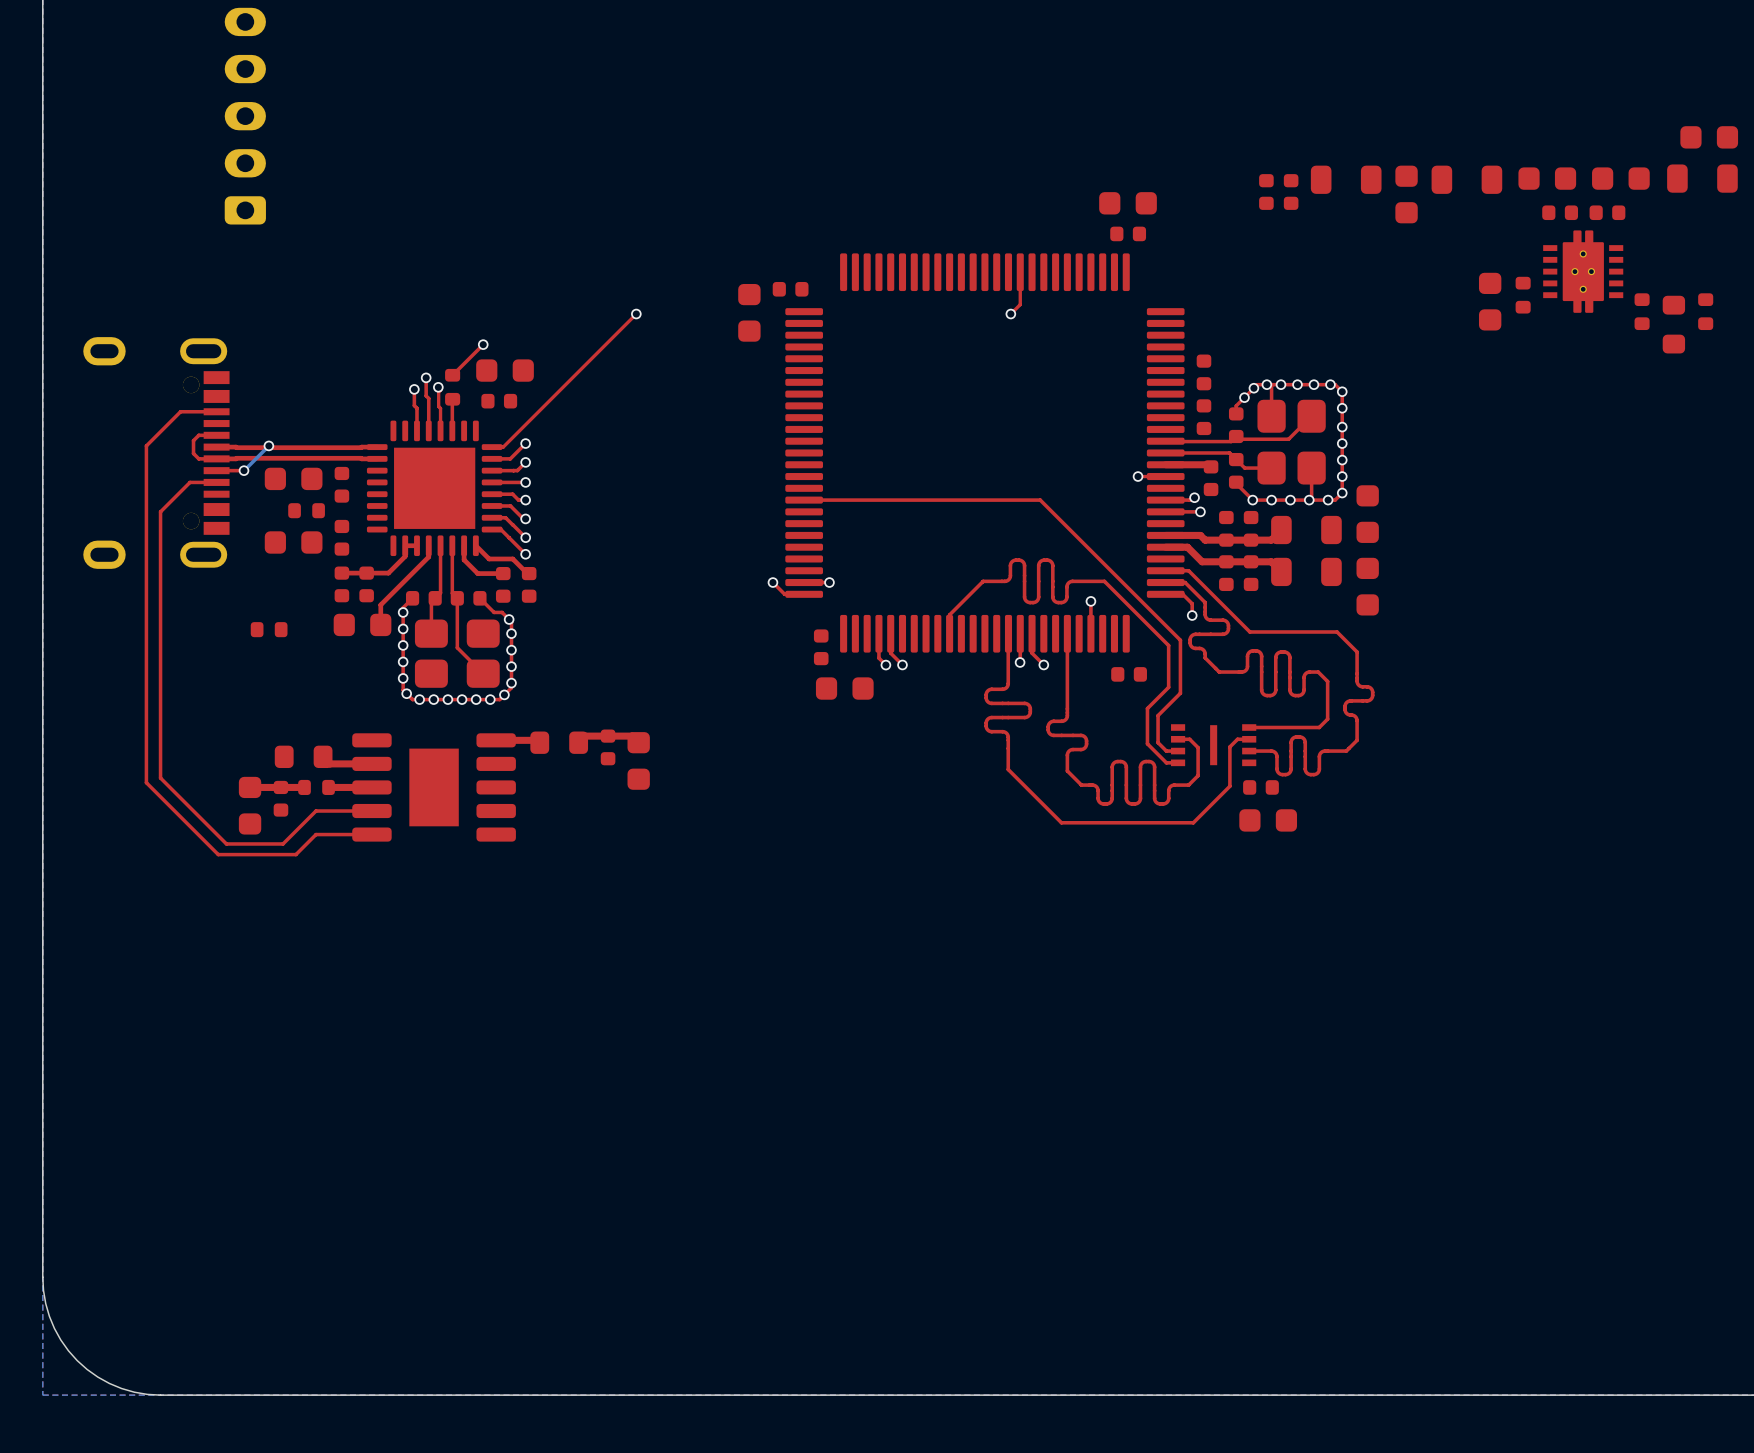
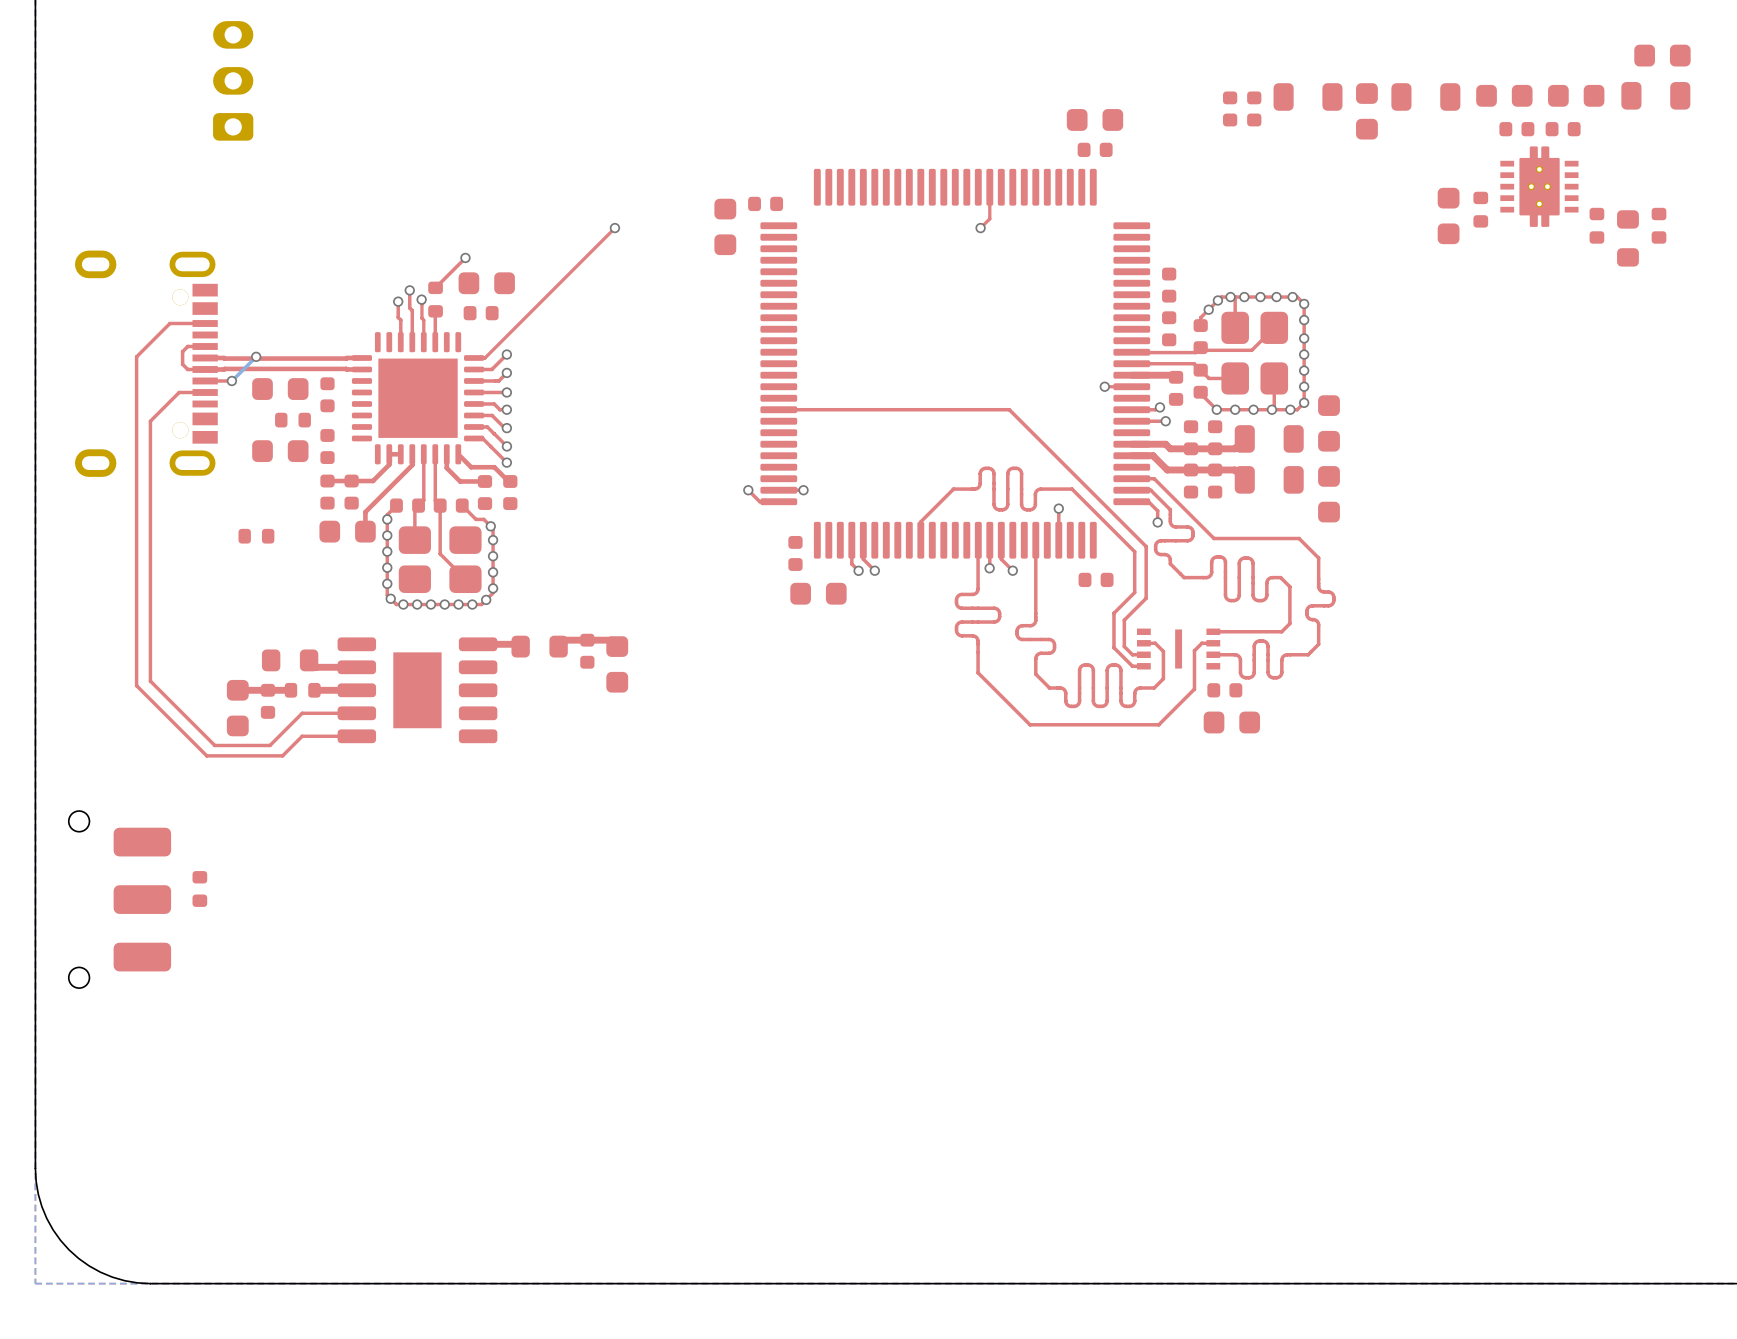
part: none -> (199, 888)
part: none -> (119, 899)

